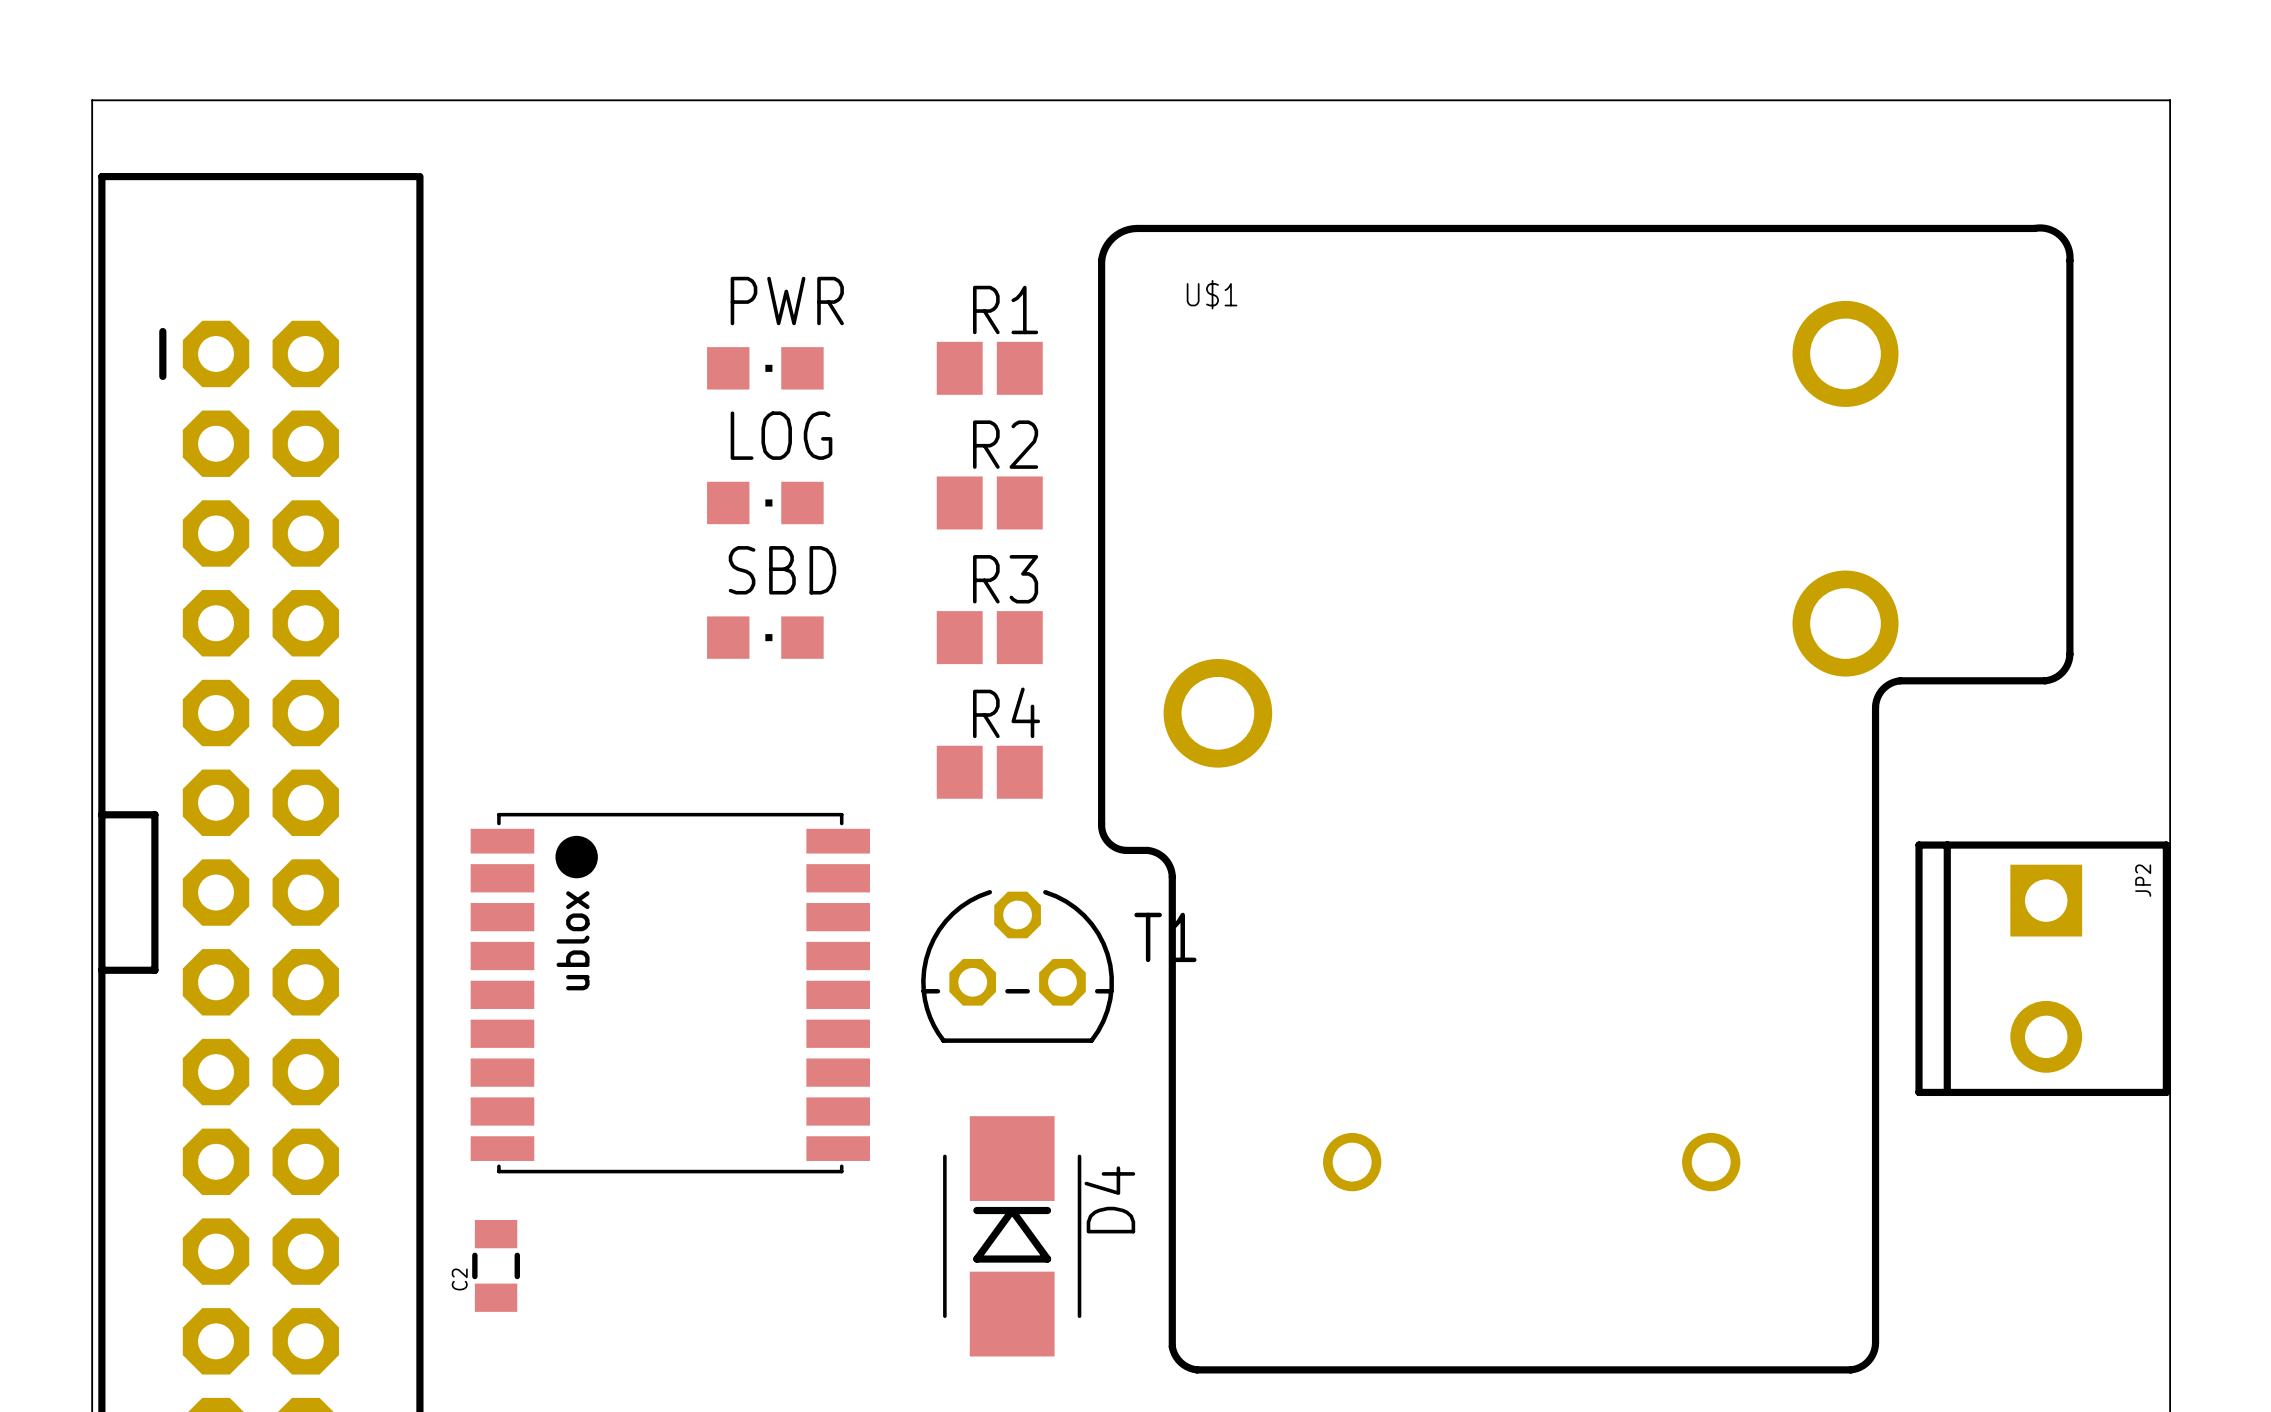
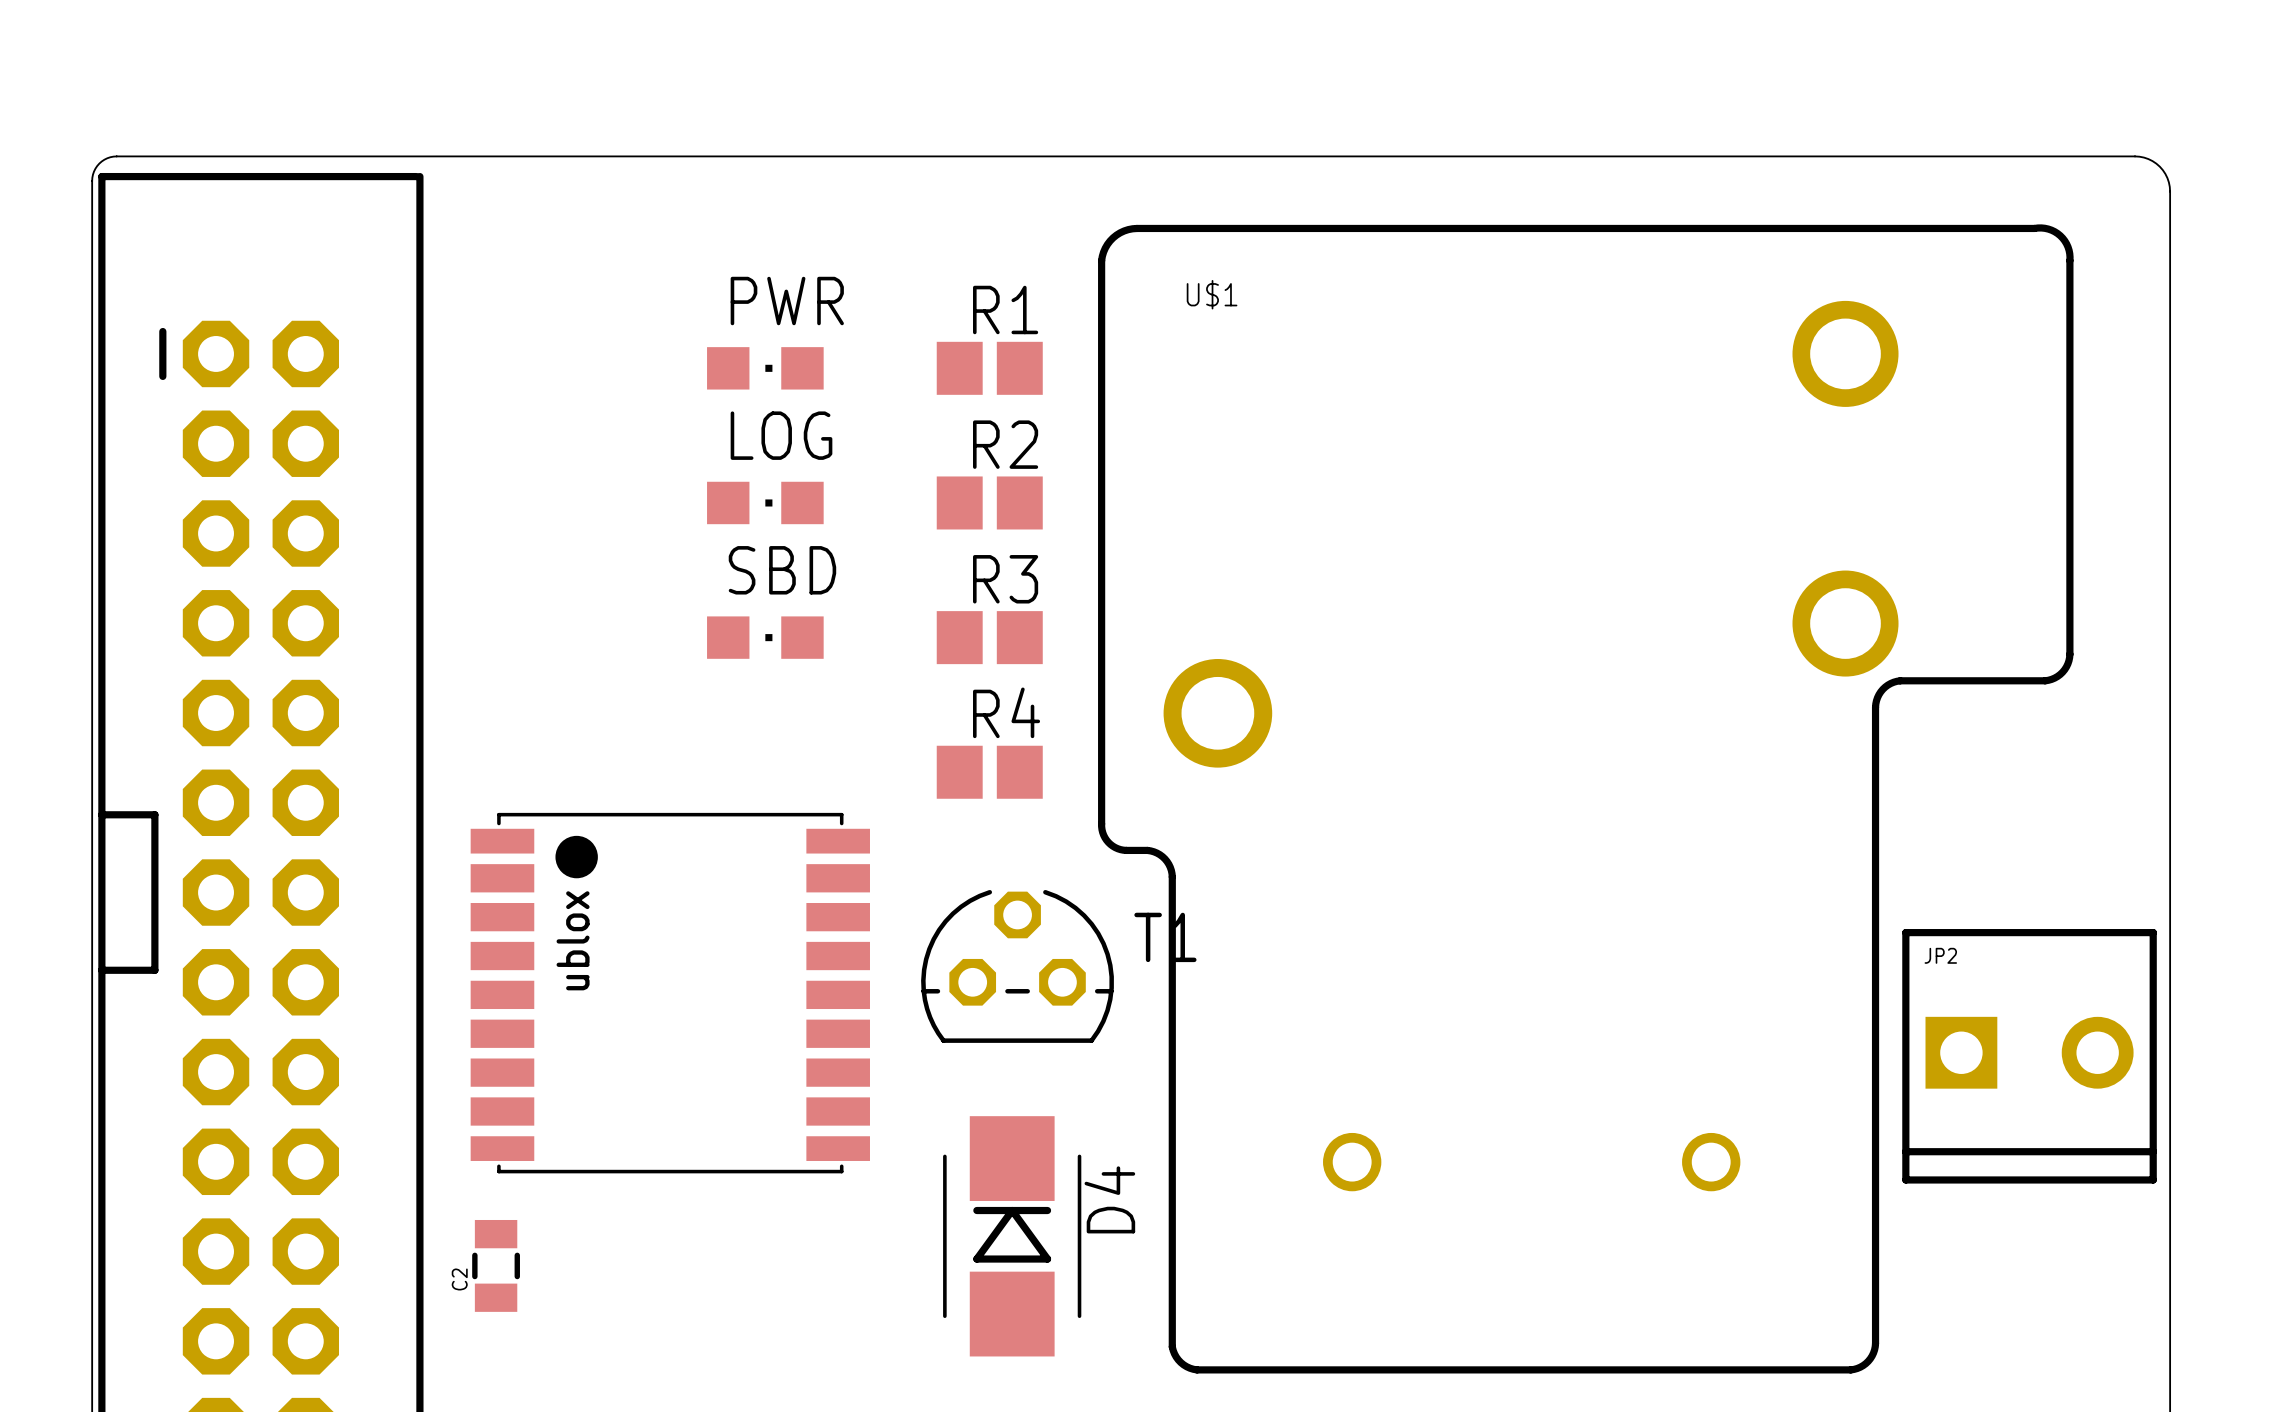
board edge: (92, 180) (92, 100) (2170, 100) (2170, 191) -> (92, 180) (94, 171) (99, 163) (107, 158) (116, 156) (2135, 156) (2148, 159) (2159, 166) (2167, 178) (2170, 191)
JP2 rotation: 0° (2042, 968) -> 90° counterclockwise (2029, 1056)

